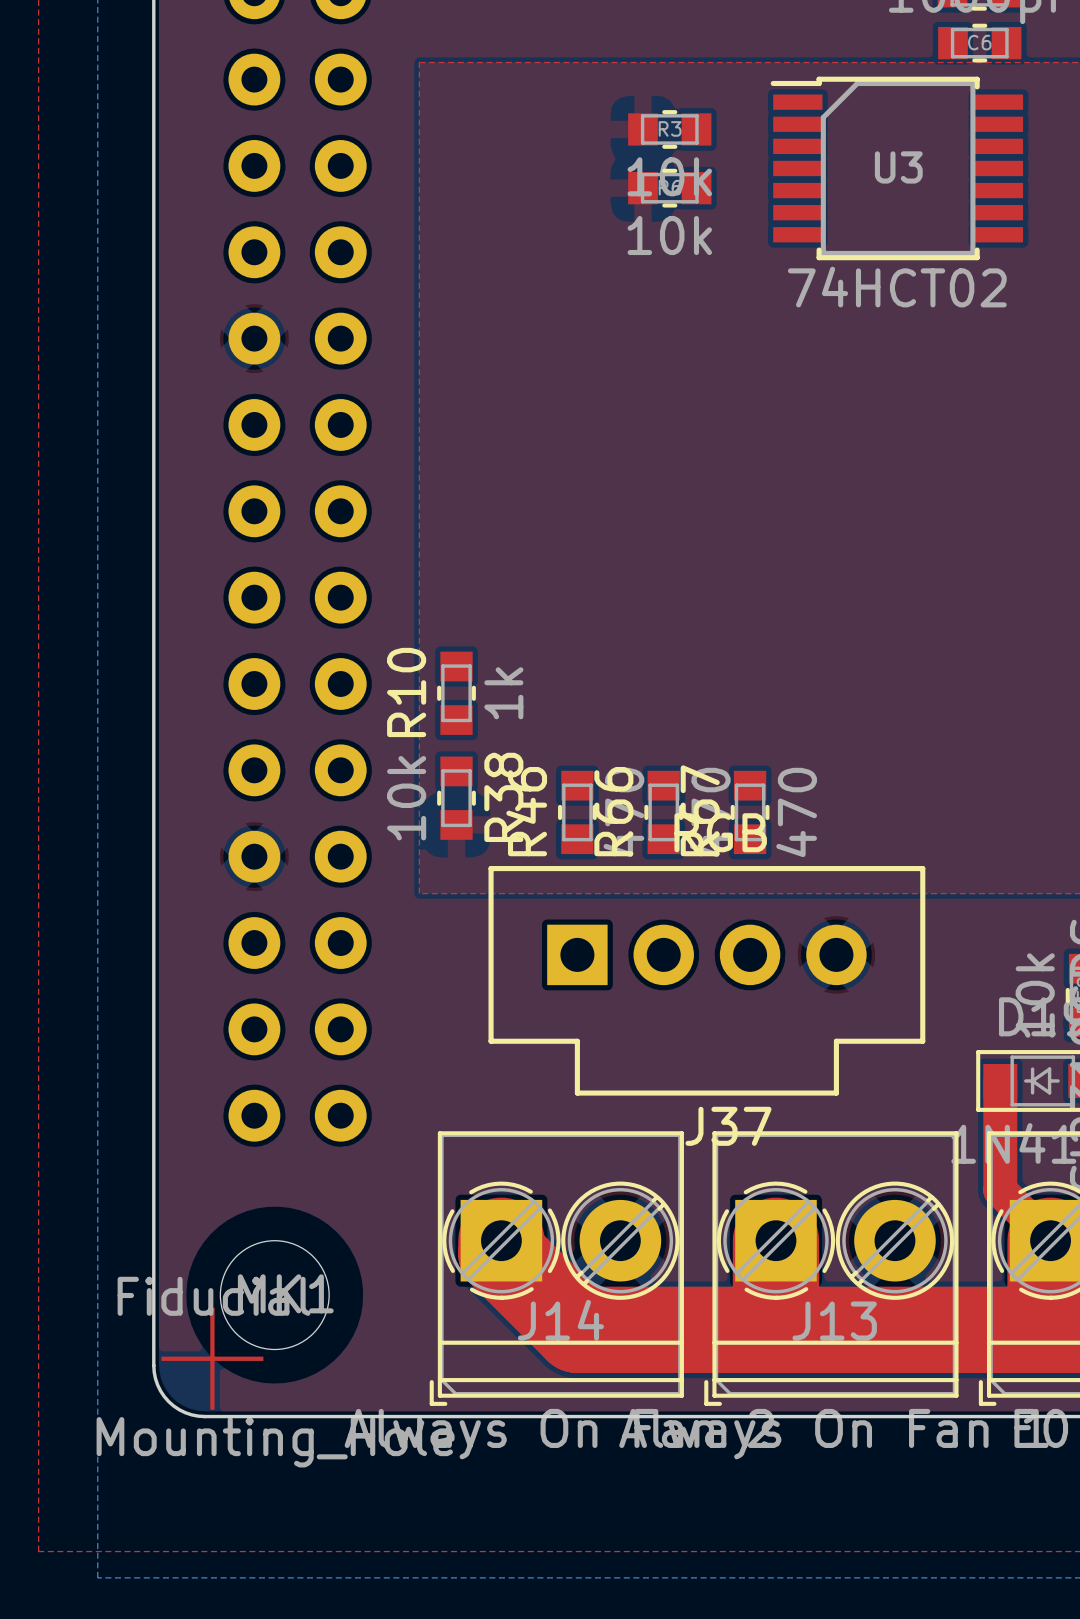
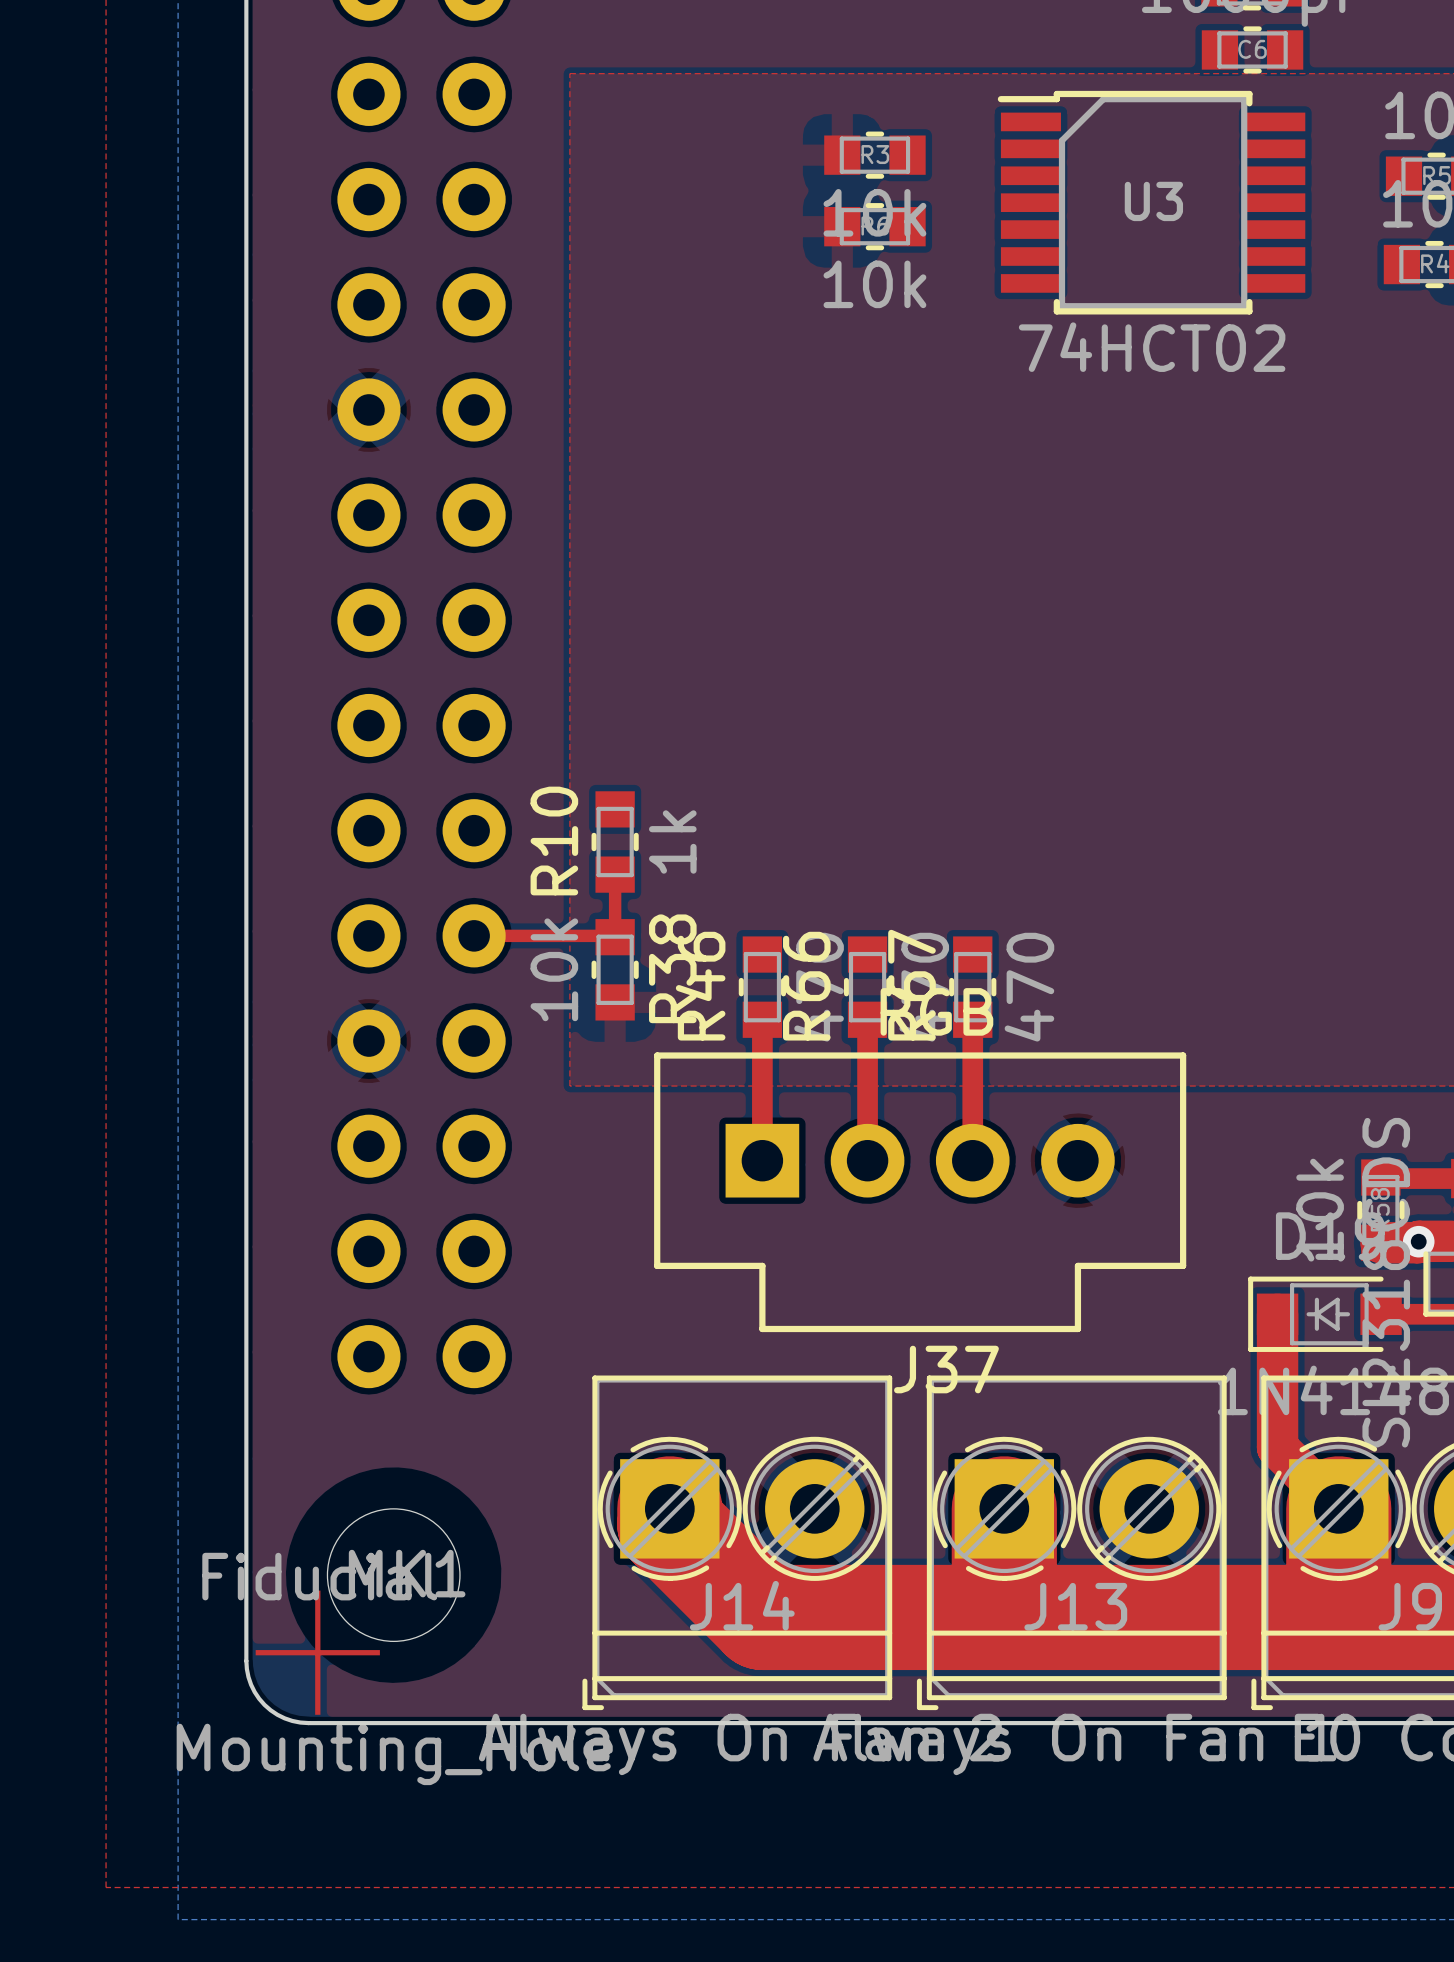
top track: none -> (615, 874) (615, 937) (474, 935)
top track: none -> (762, 1019) (762, 1160)
top track: none -> (867, 1019) (867, 1160)
top track: none -> (972, 1019) (972, 1160)

